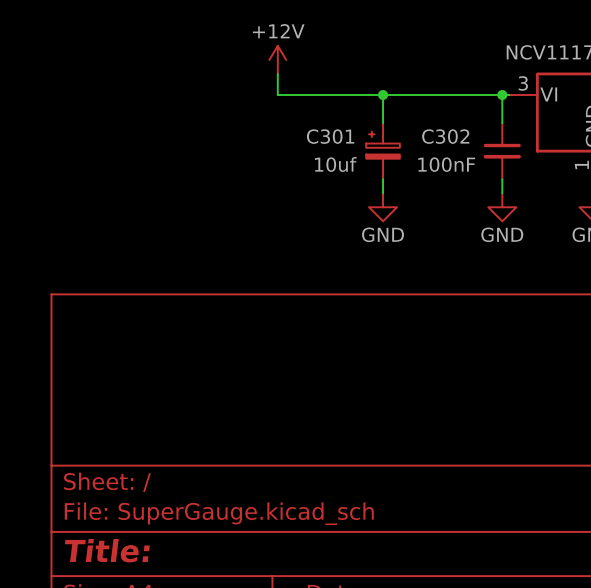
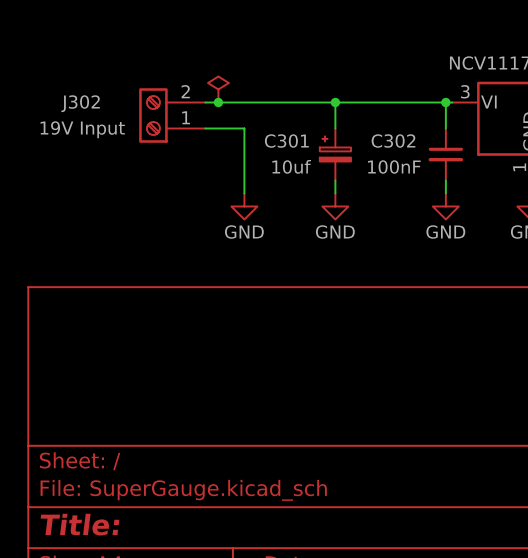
power symbol: +12V (277, 59) -> none
wire: (277, 73) (277, 95) -> (205, 102) (237, 102)
power symbol: none -> (218, 89)
junction: none -> (218, 102)
J302: none -> 19V Input (172, 115)
wire: none -> (205, 128) (244, 128) (244, 193)
power symbol: none -> GND (244, 206)

